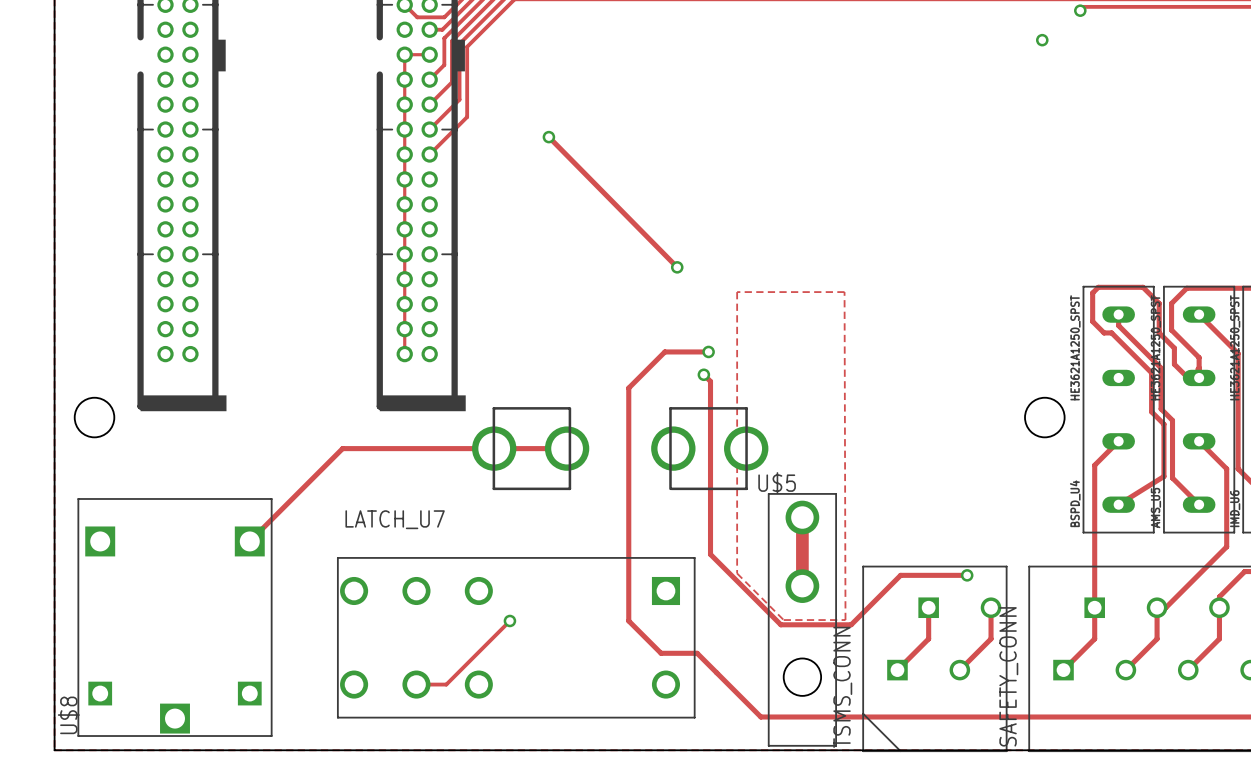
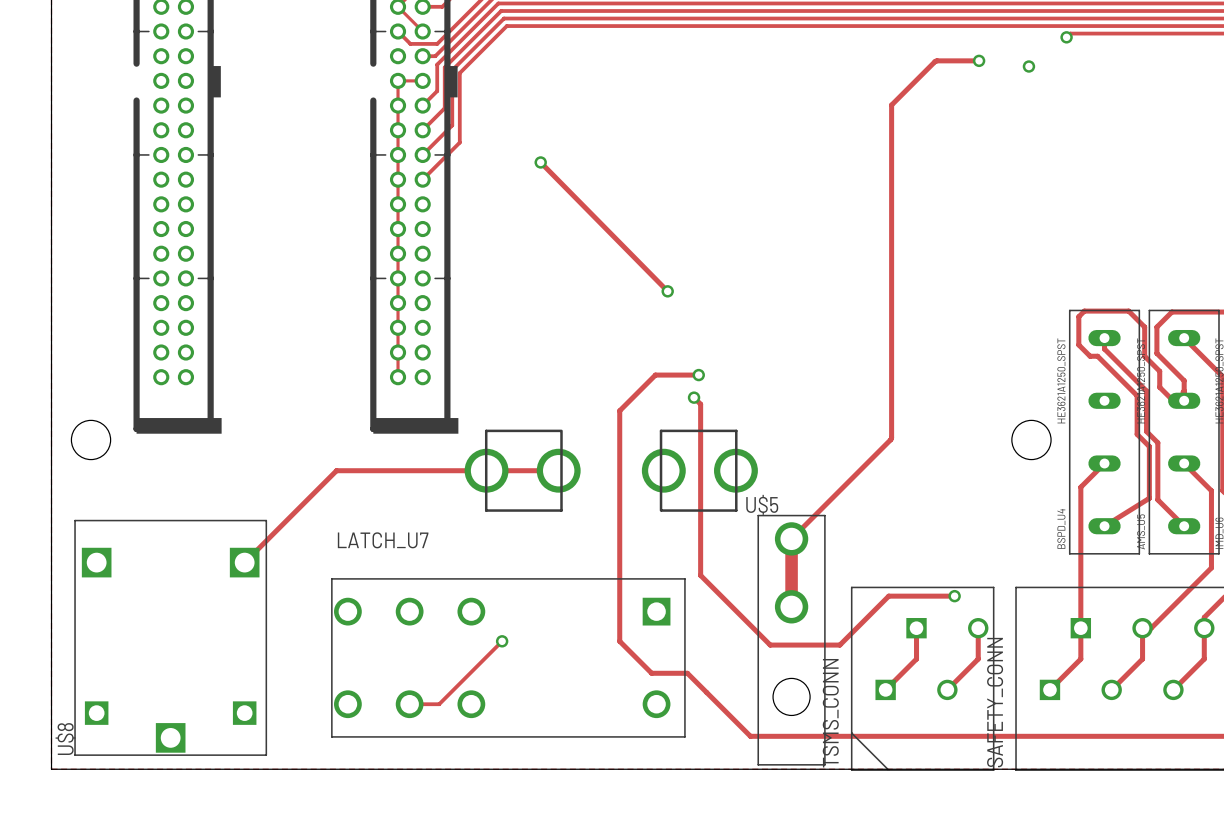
track: none -> (979, 60) (935, 61) (891, 105) (891, 438) (791, 538)
via: none -> (979, 60)
zone outline: (737, 292) (844, 292) (845, 620) (783, 620) (737, 573) (737, 292) -> none

